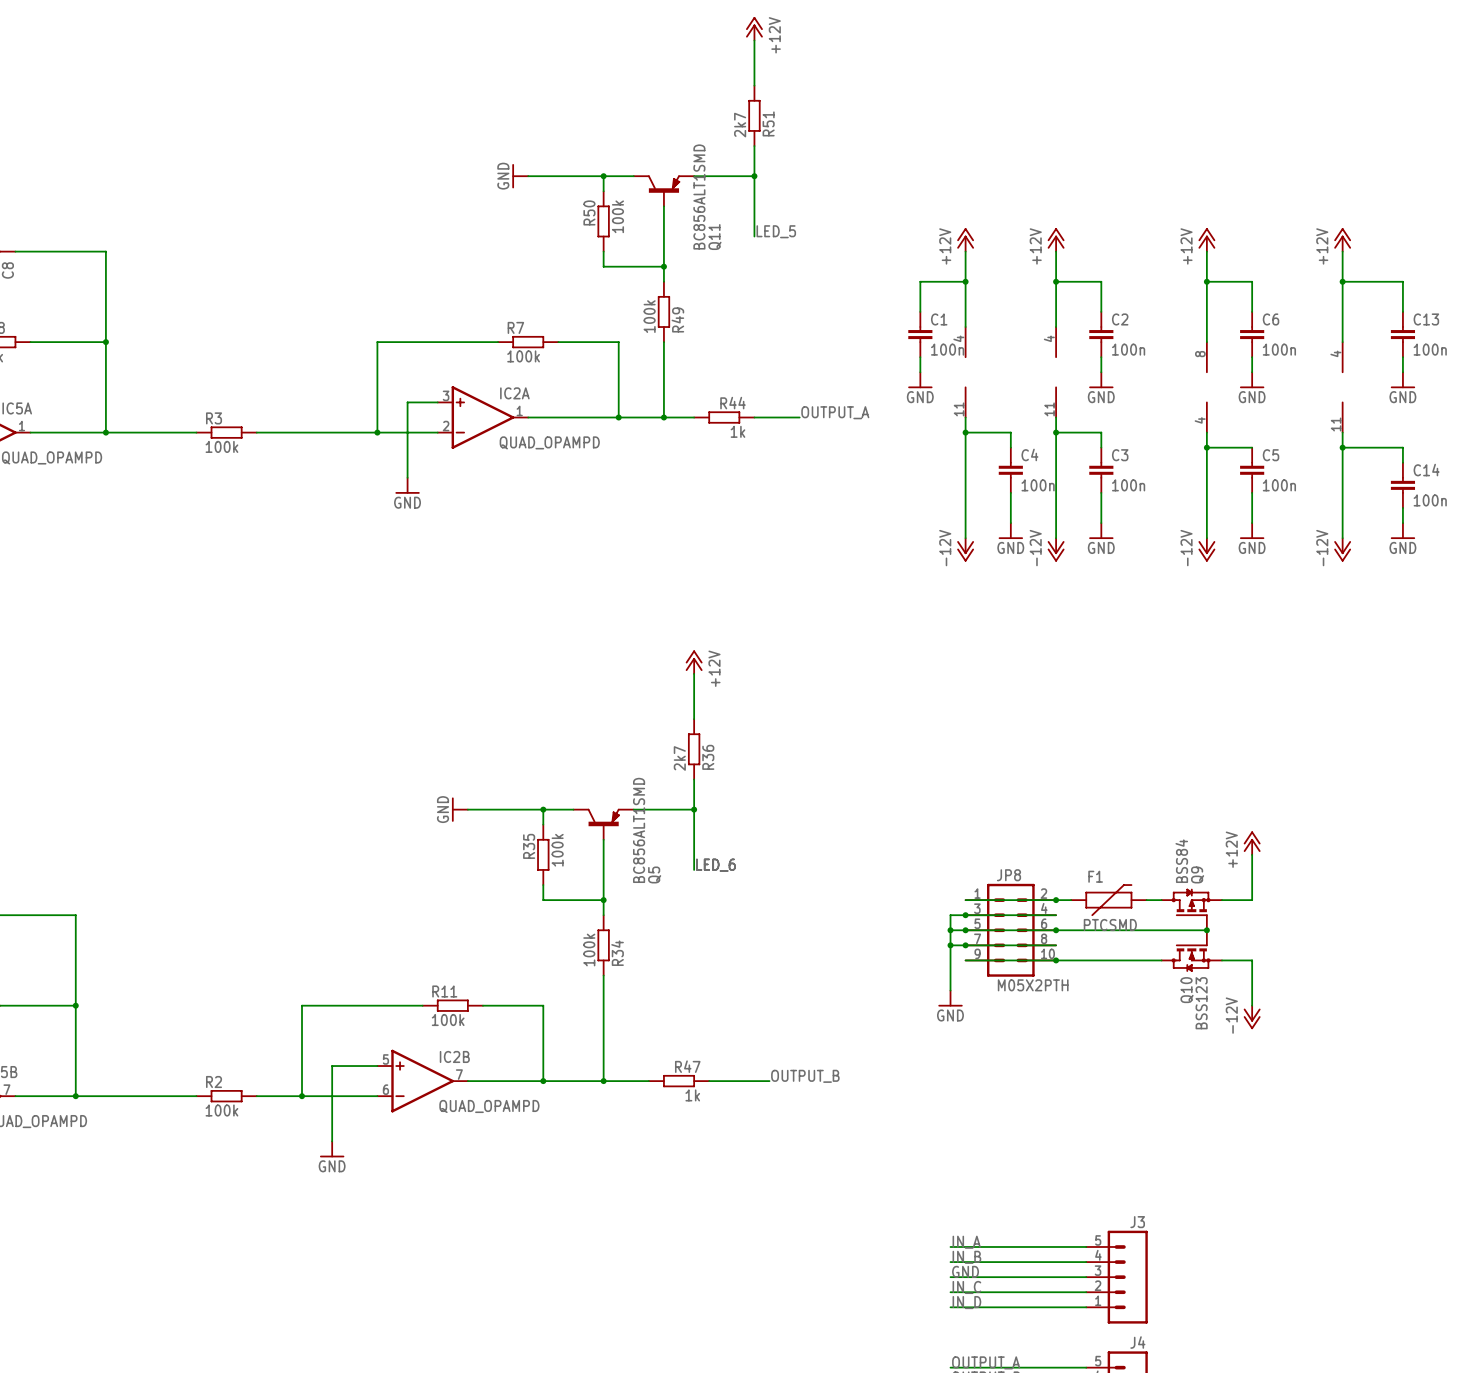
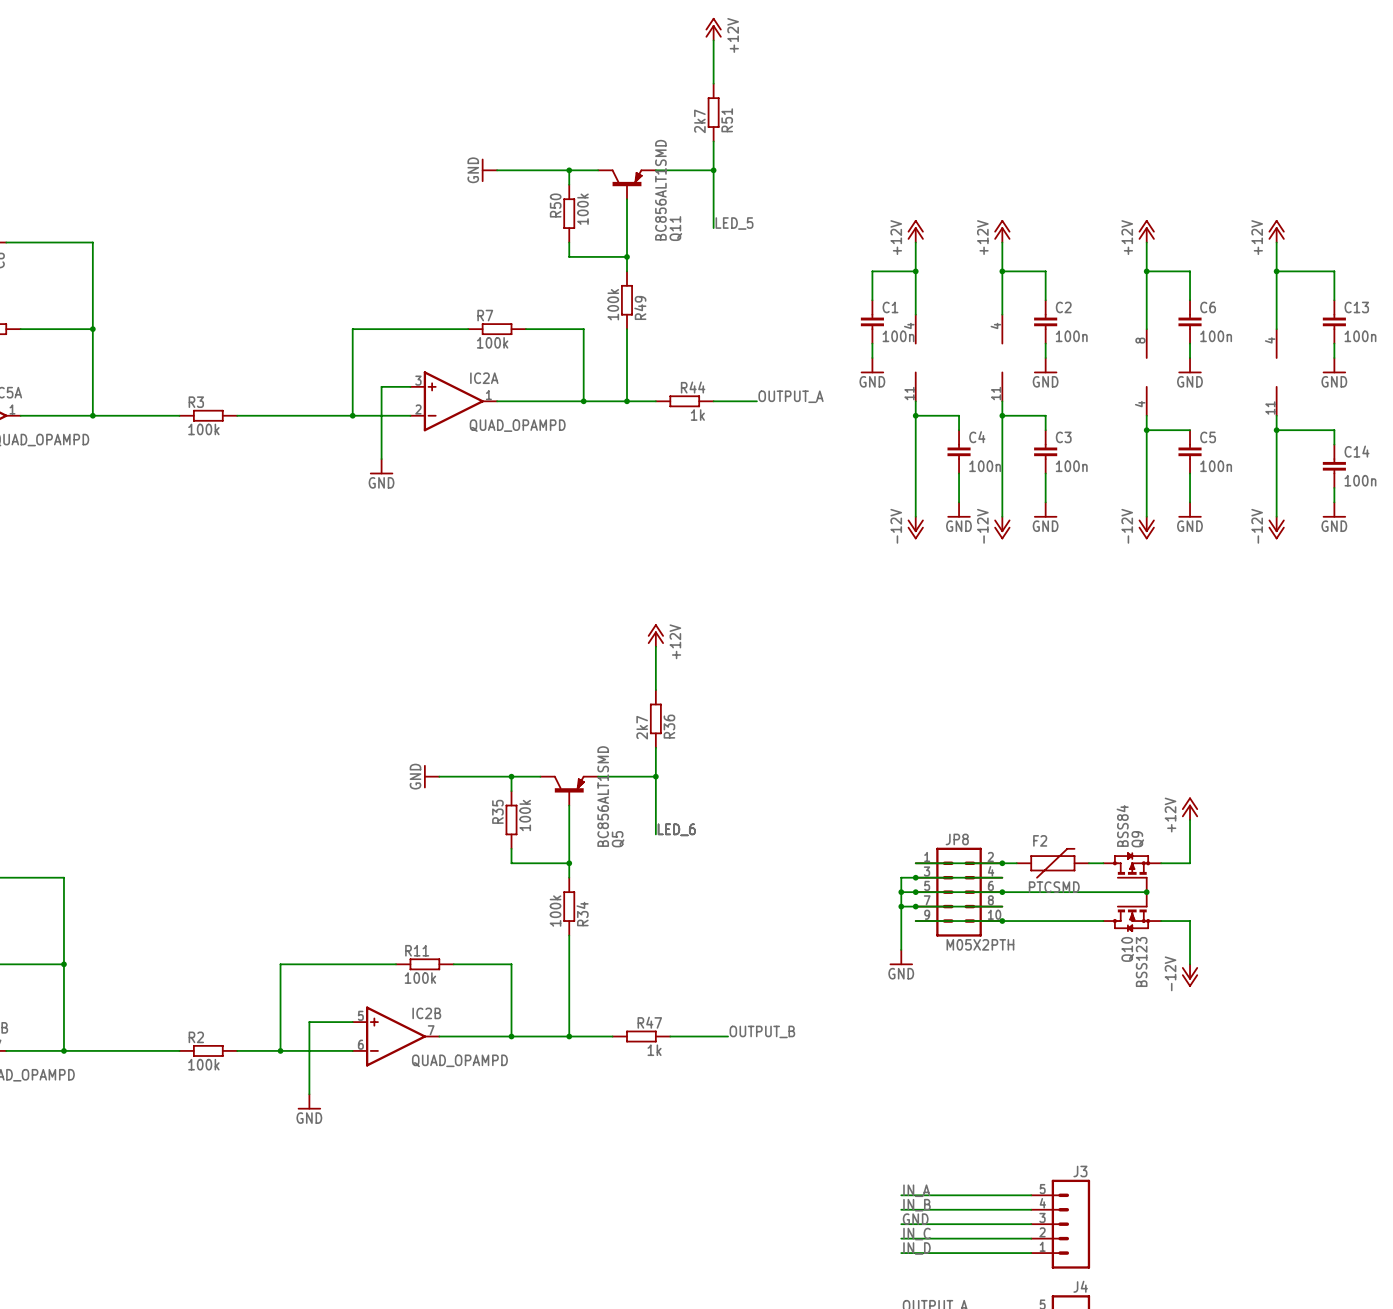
F1 name: F1 (1095, 876) -> F2 (1040, 840)

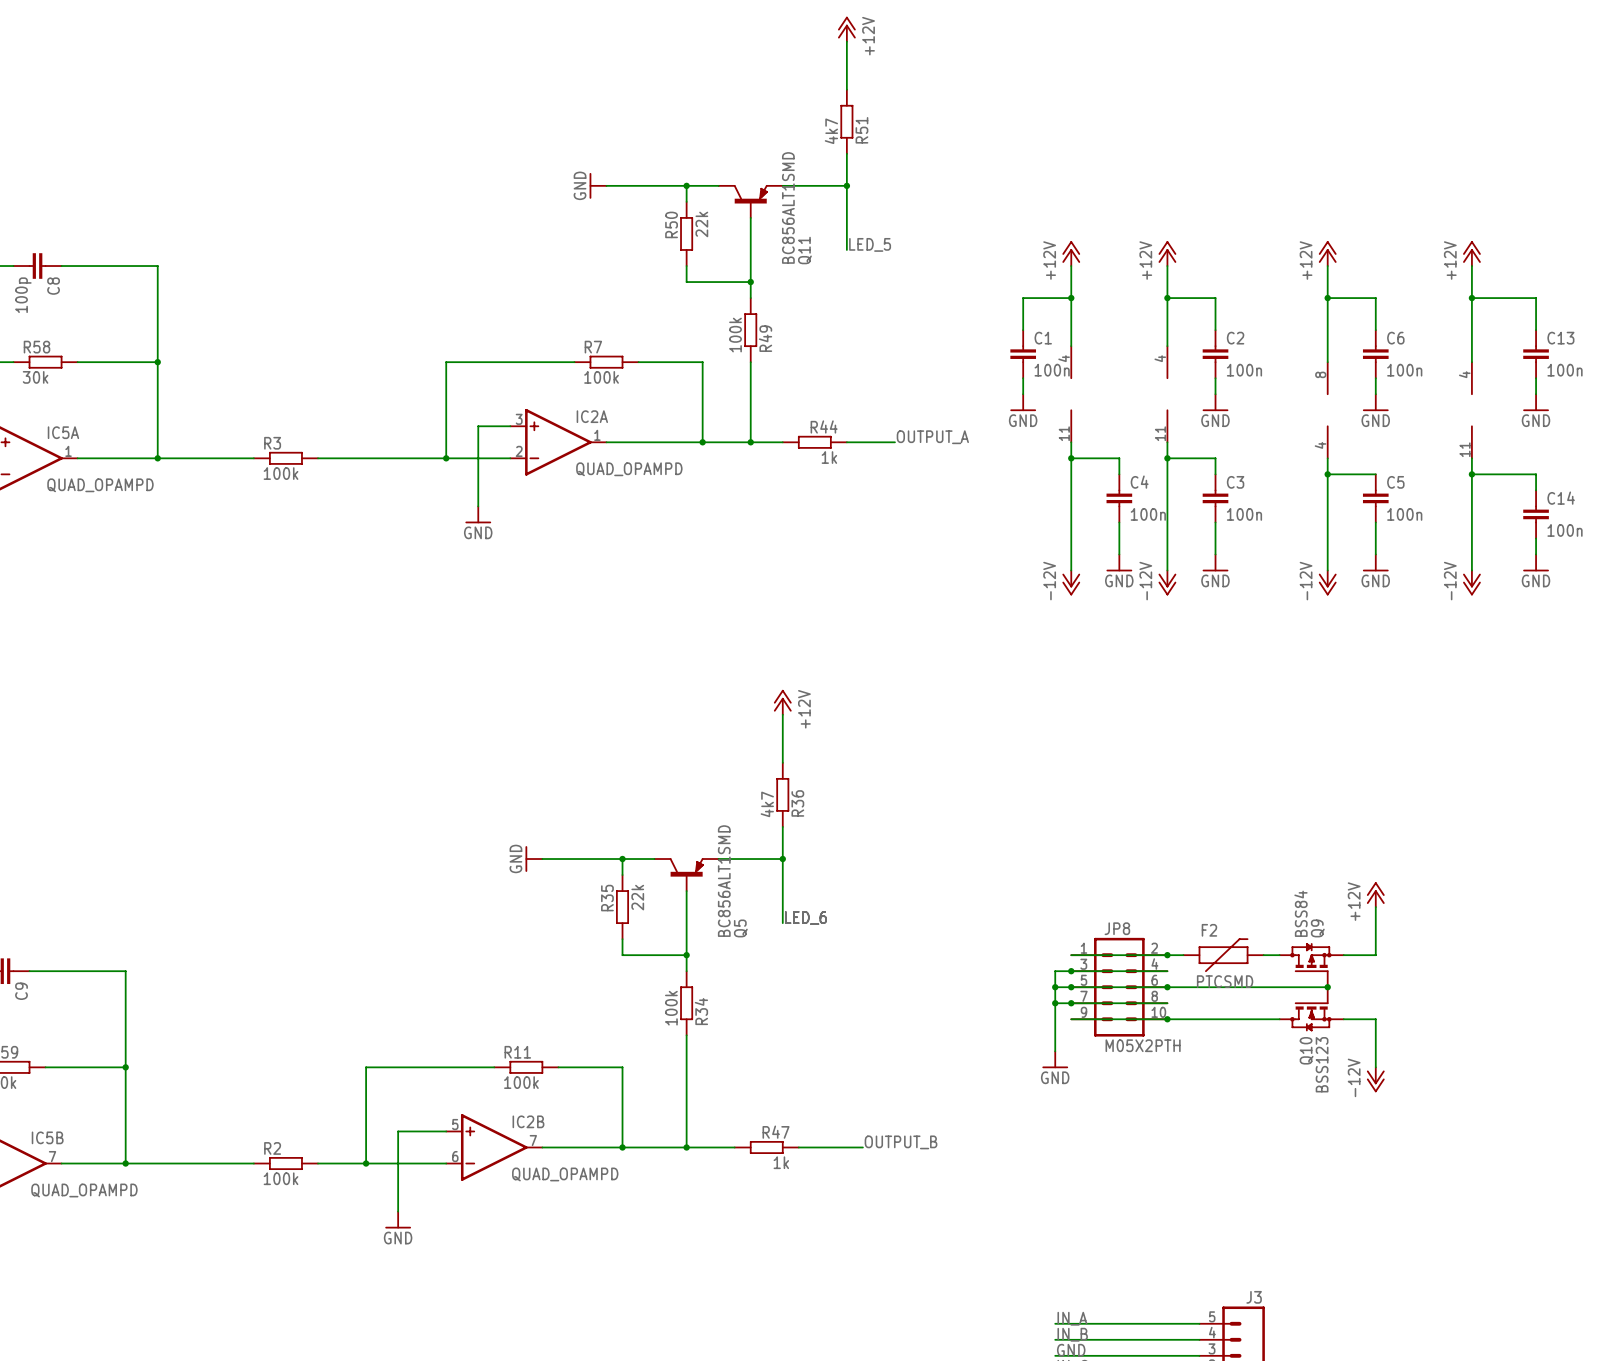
R51 value: 2k7 (699, 121) -> 4k7 (831, 131)
R50 value: 100k (582, 209) -> 22k (701, 224)
R36 value: 2k7 (642, 727) -> 4k7 (767, 804)
R35 value: 100k (525, 815) -> 22k (637, 897)

